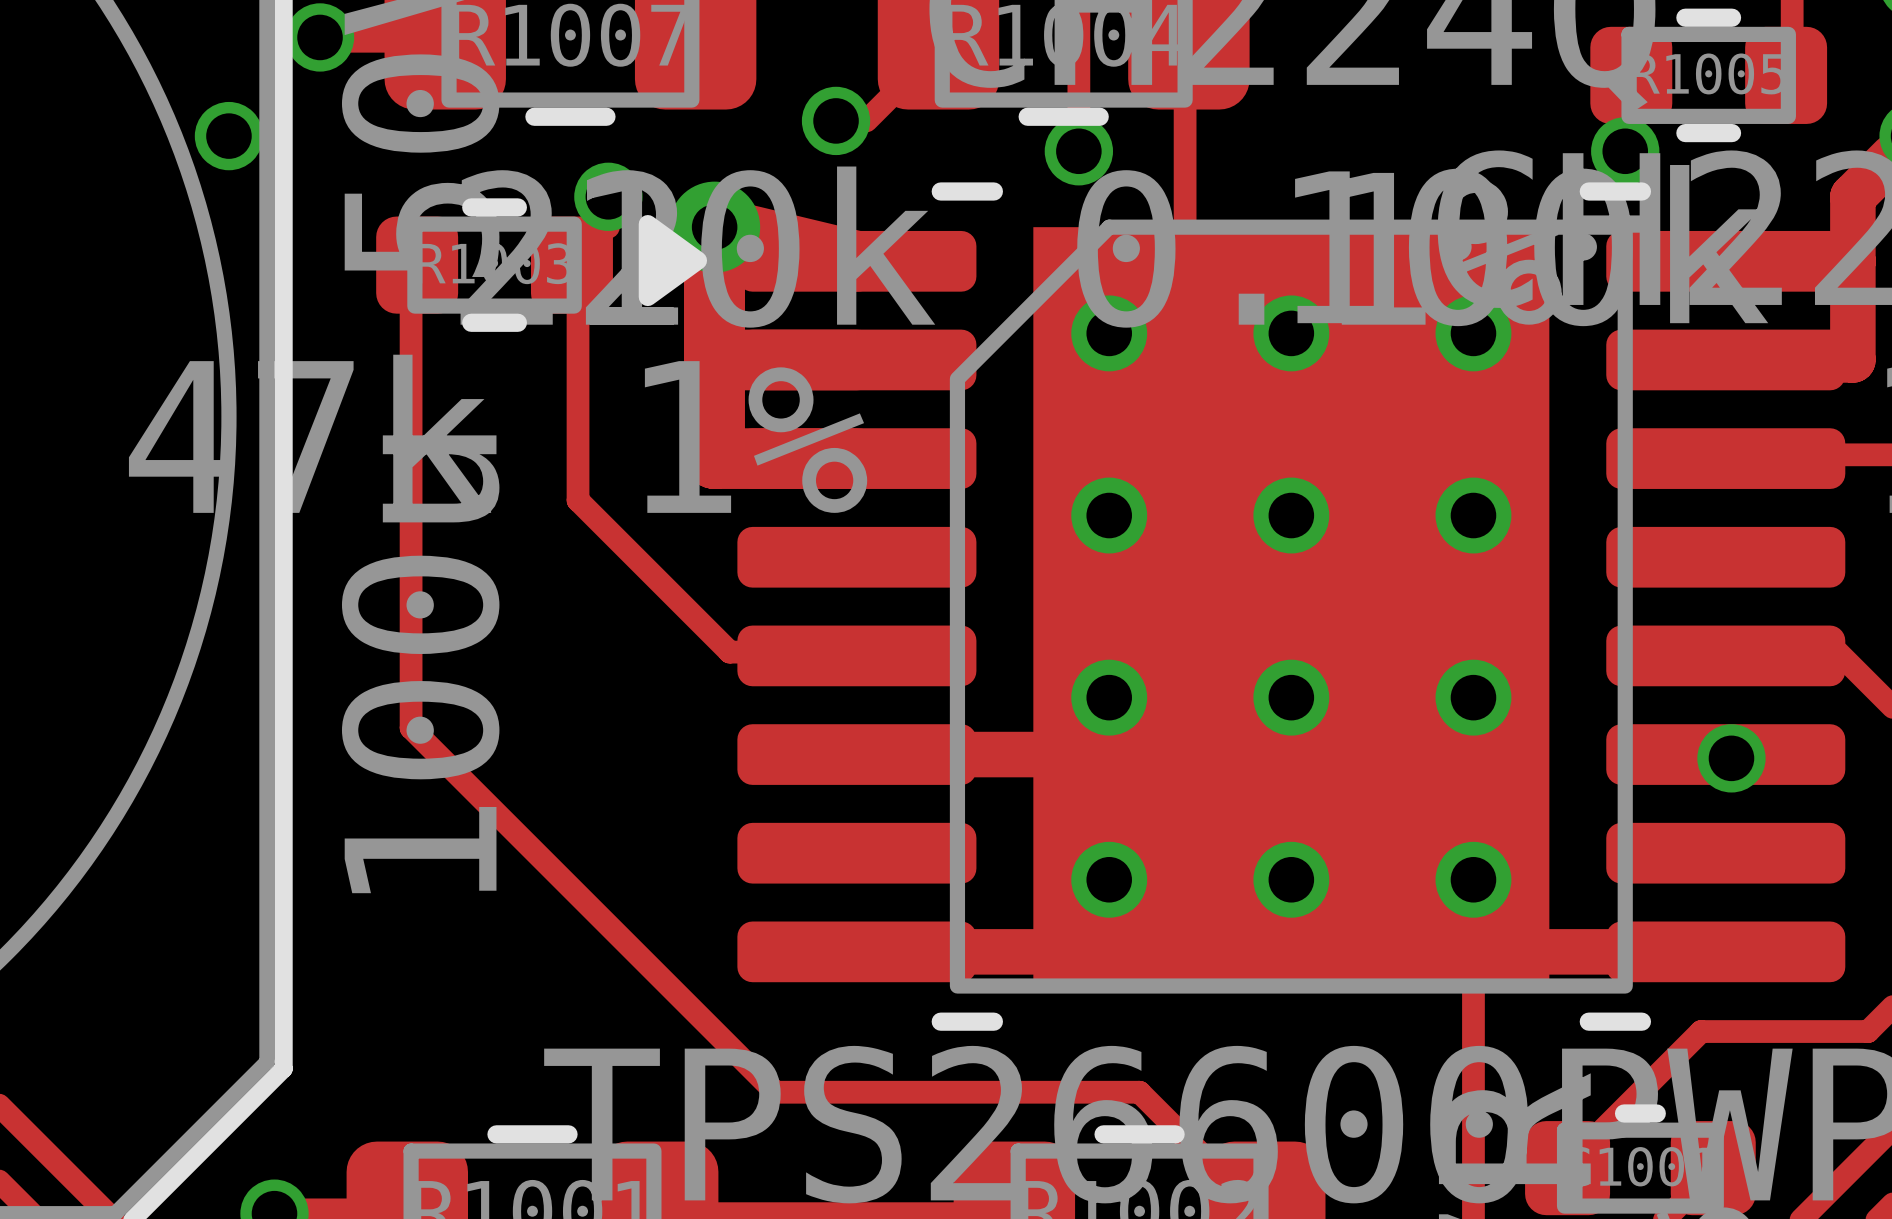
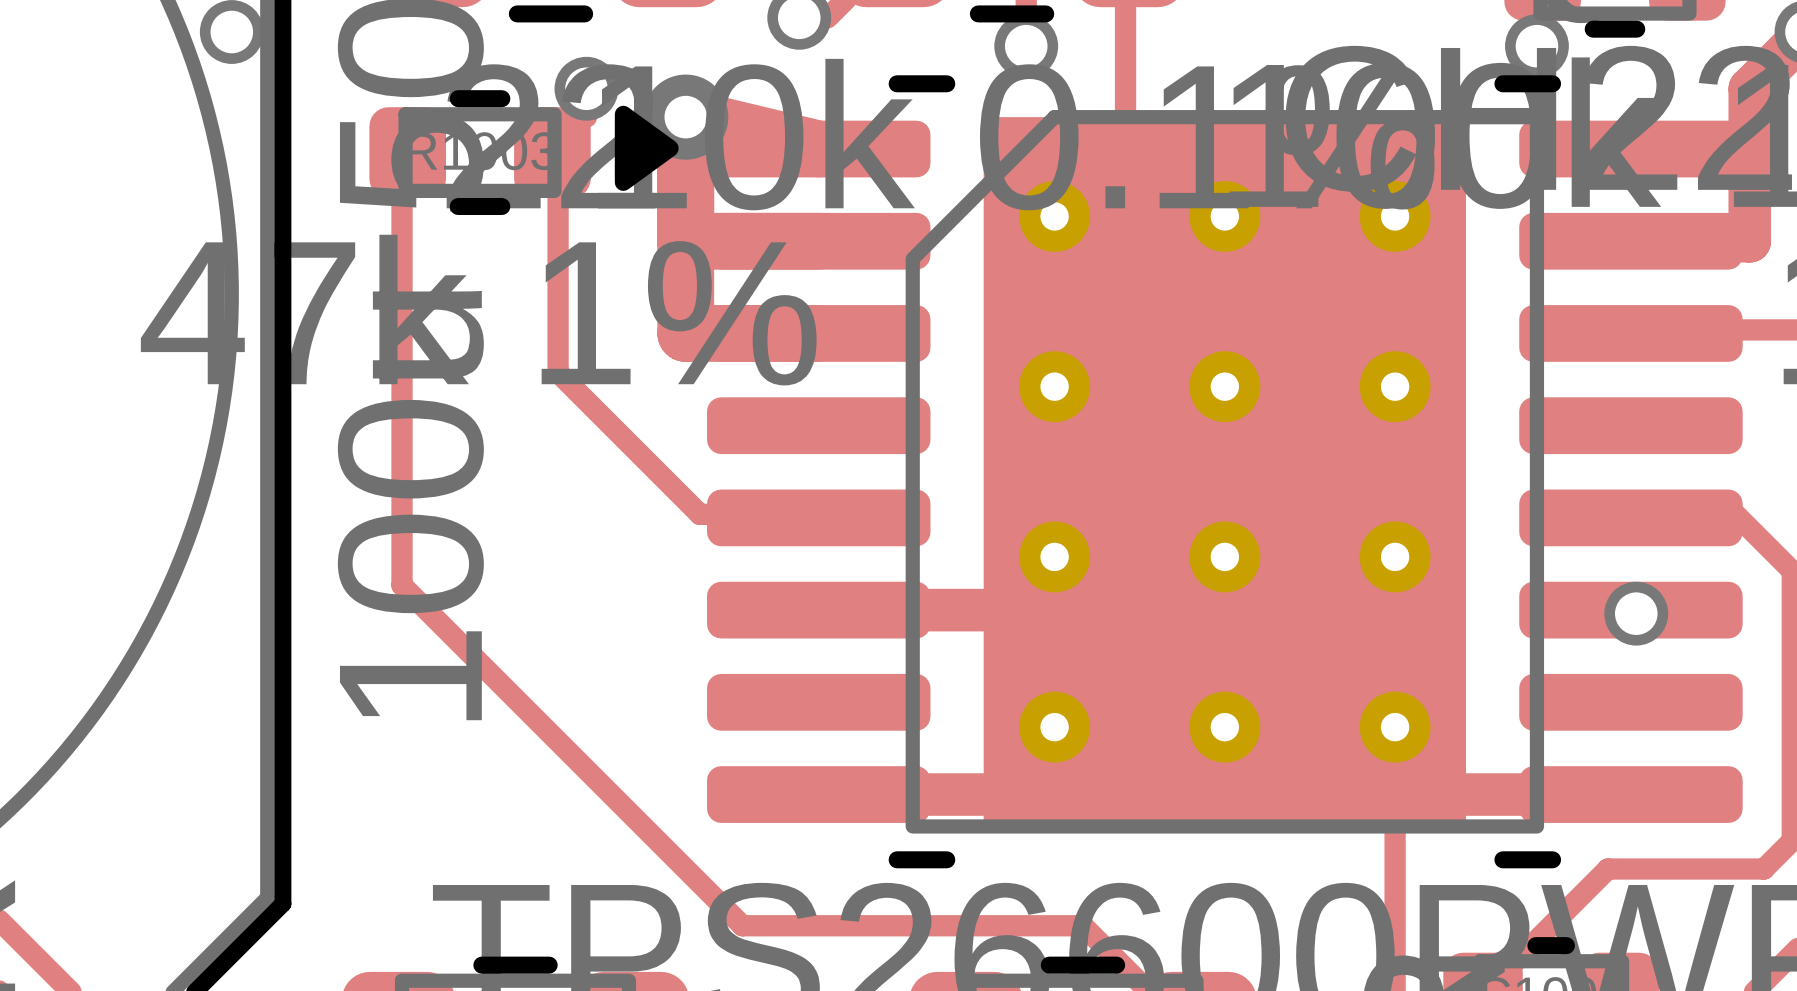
part footprint: [638, 182, 1846, 1031] -> [614, 75, 1743, 869]

